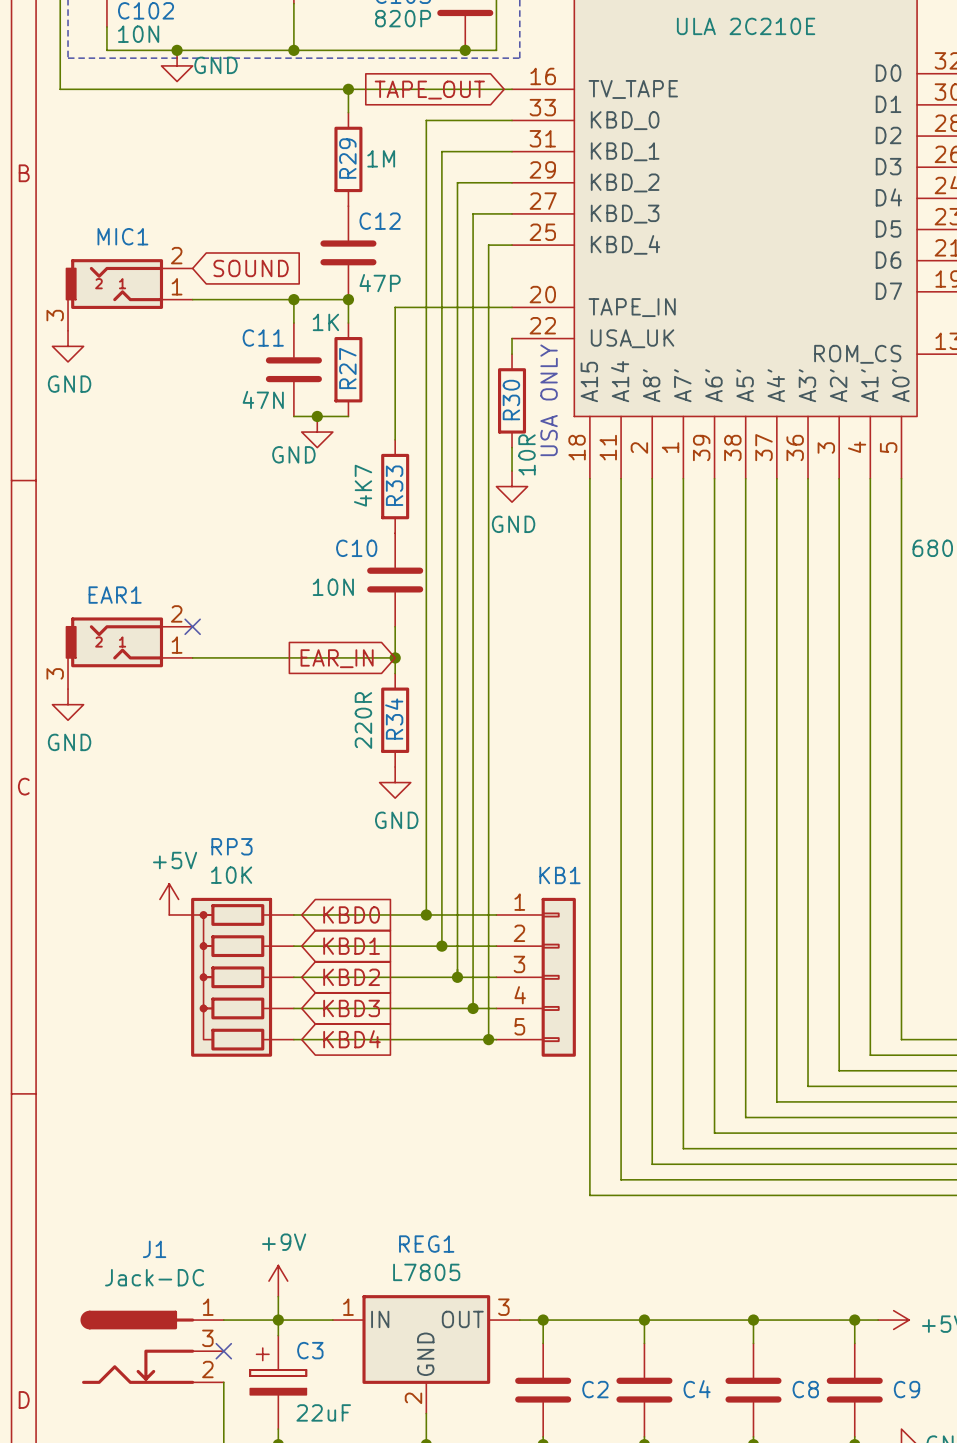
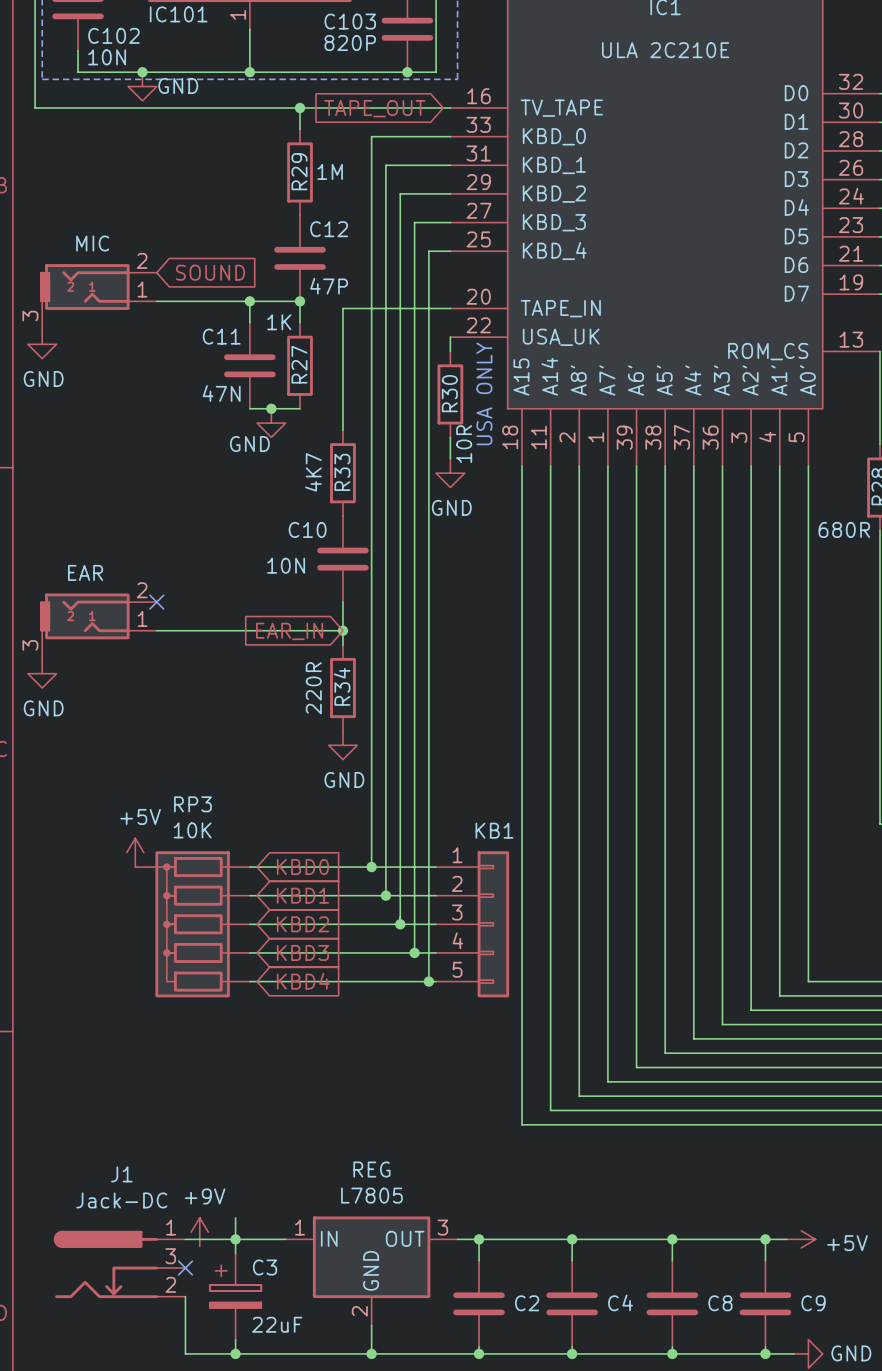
MIC1 name: MIC1 (122, 236) -> MIC (92, 243)
EAR1 name: EAR1 (115, 595) -> EAR (85, 572)
REG1 name: REG1 (426, 1244) -> REG (371, 1169)
power symbol position: +9V (278, 1281) -> +9V (199, 1232)

